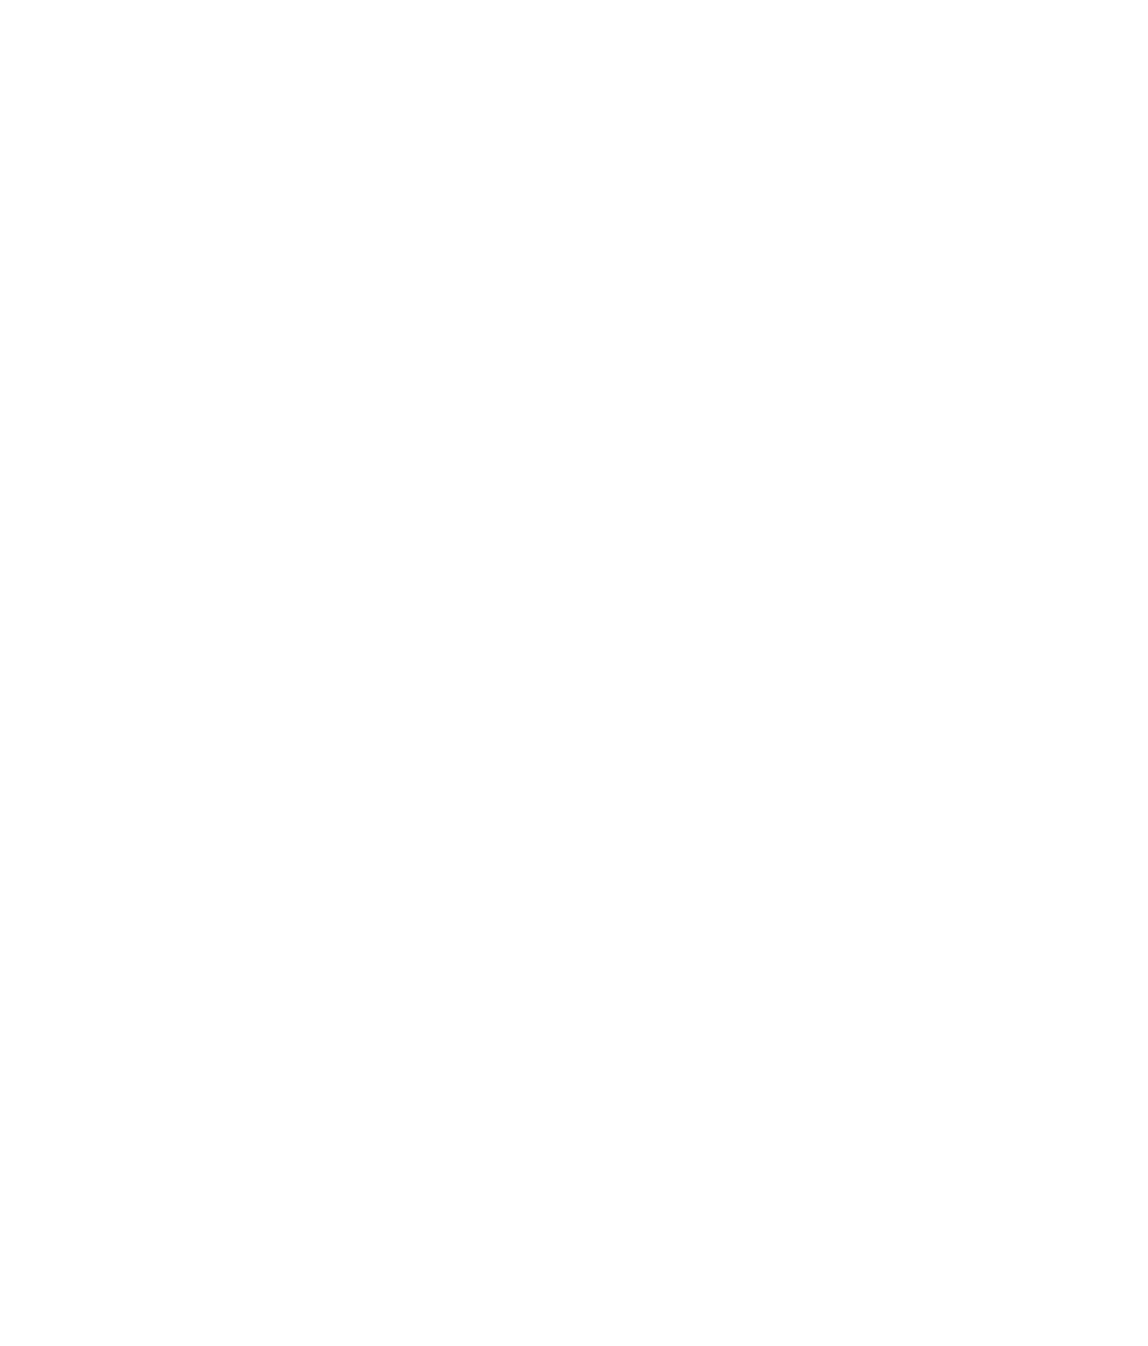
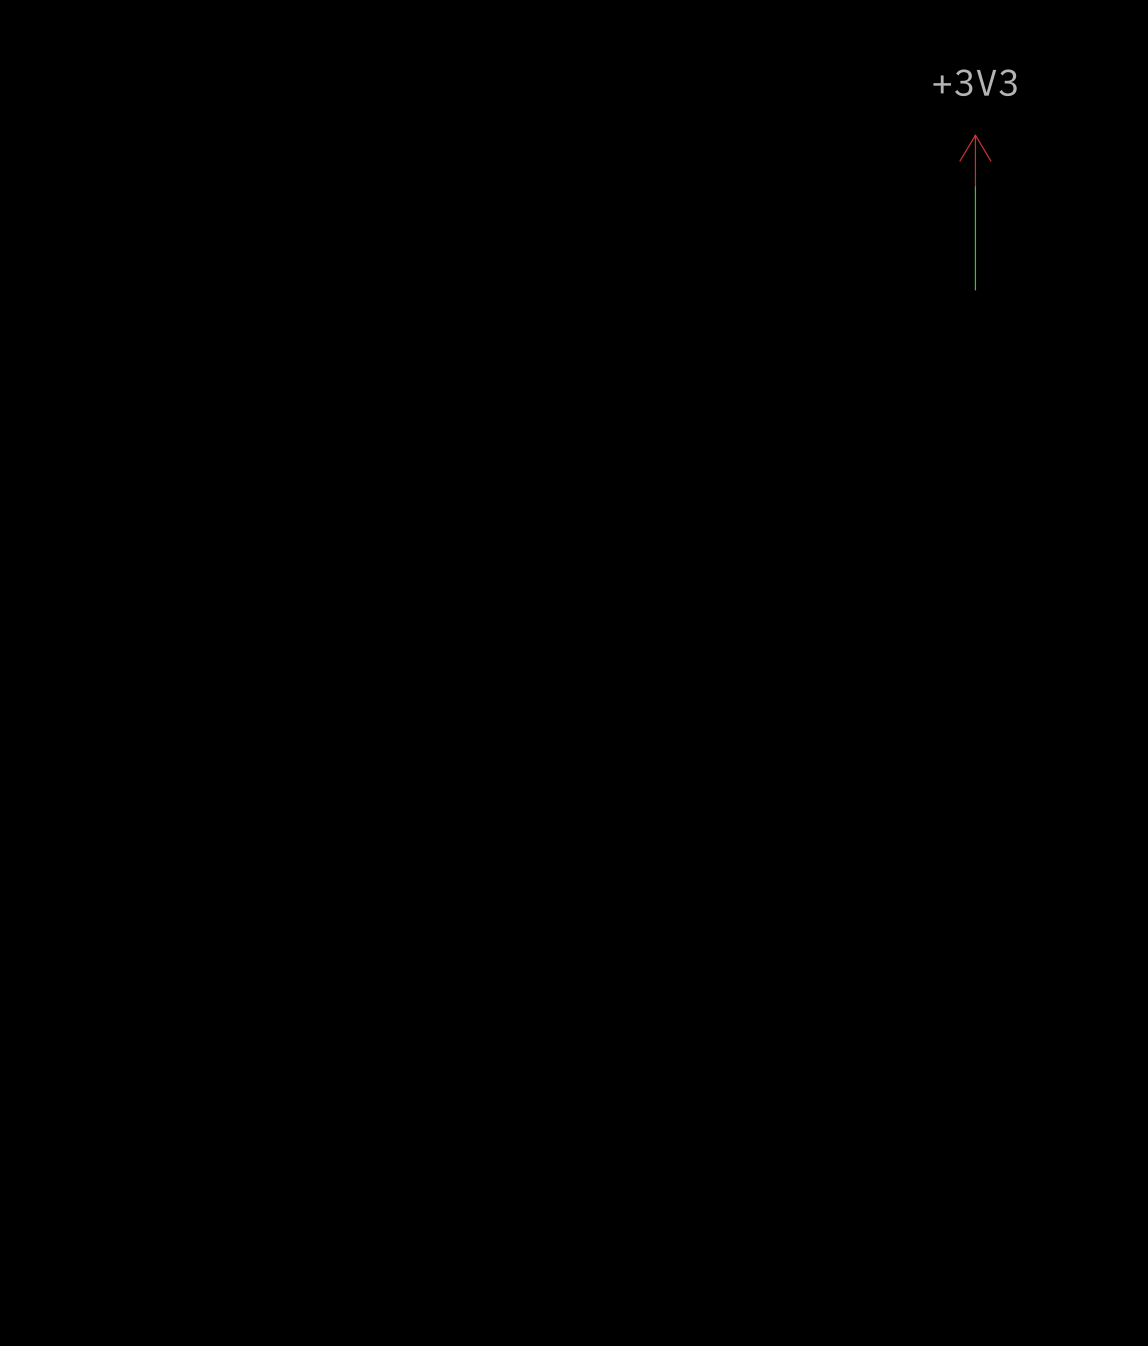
power symbol: none -> +3V3 (975, 161)
wire: none -> (975, 186) (975, 289)

